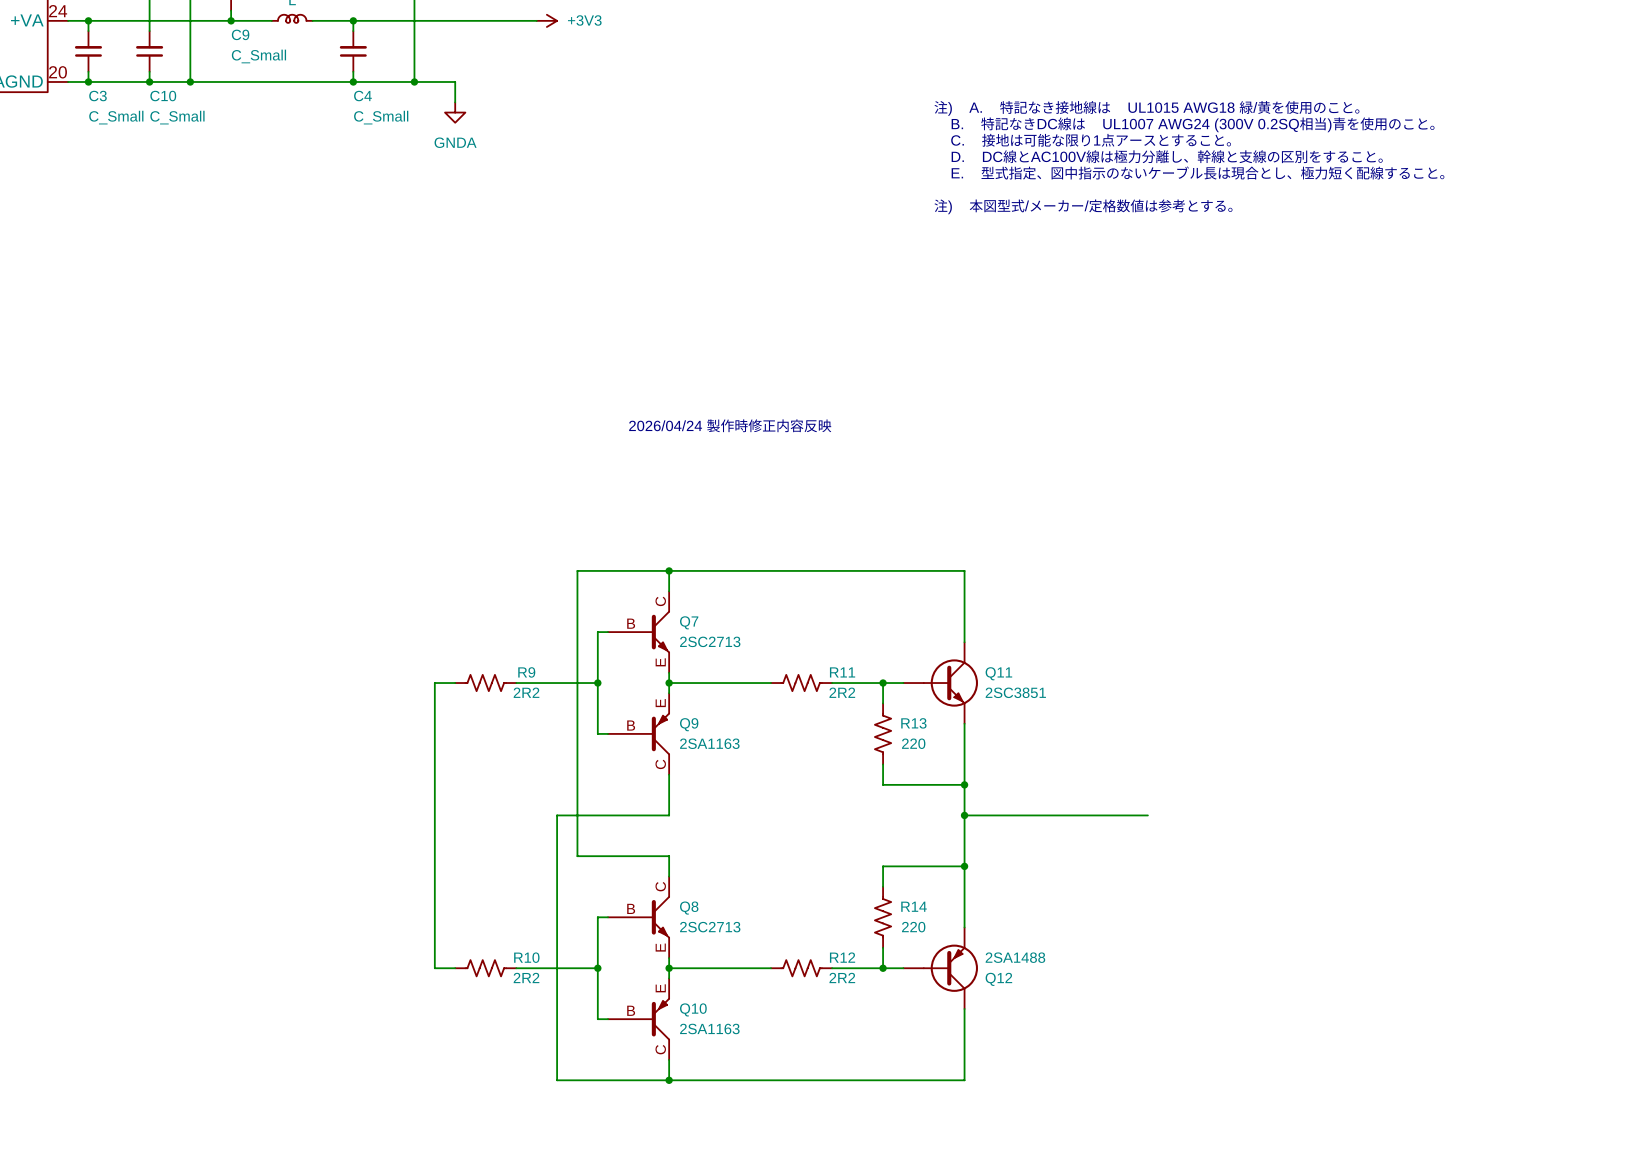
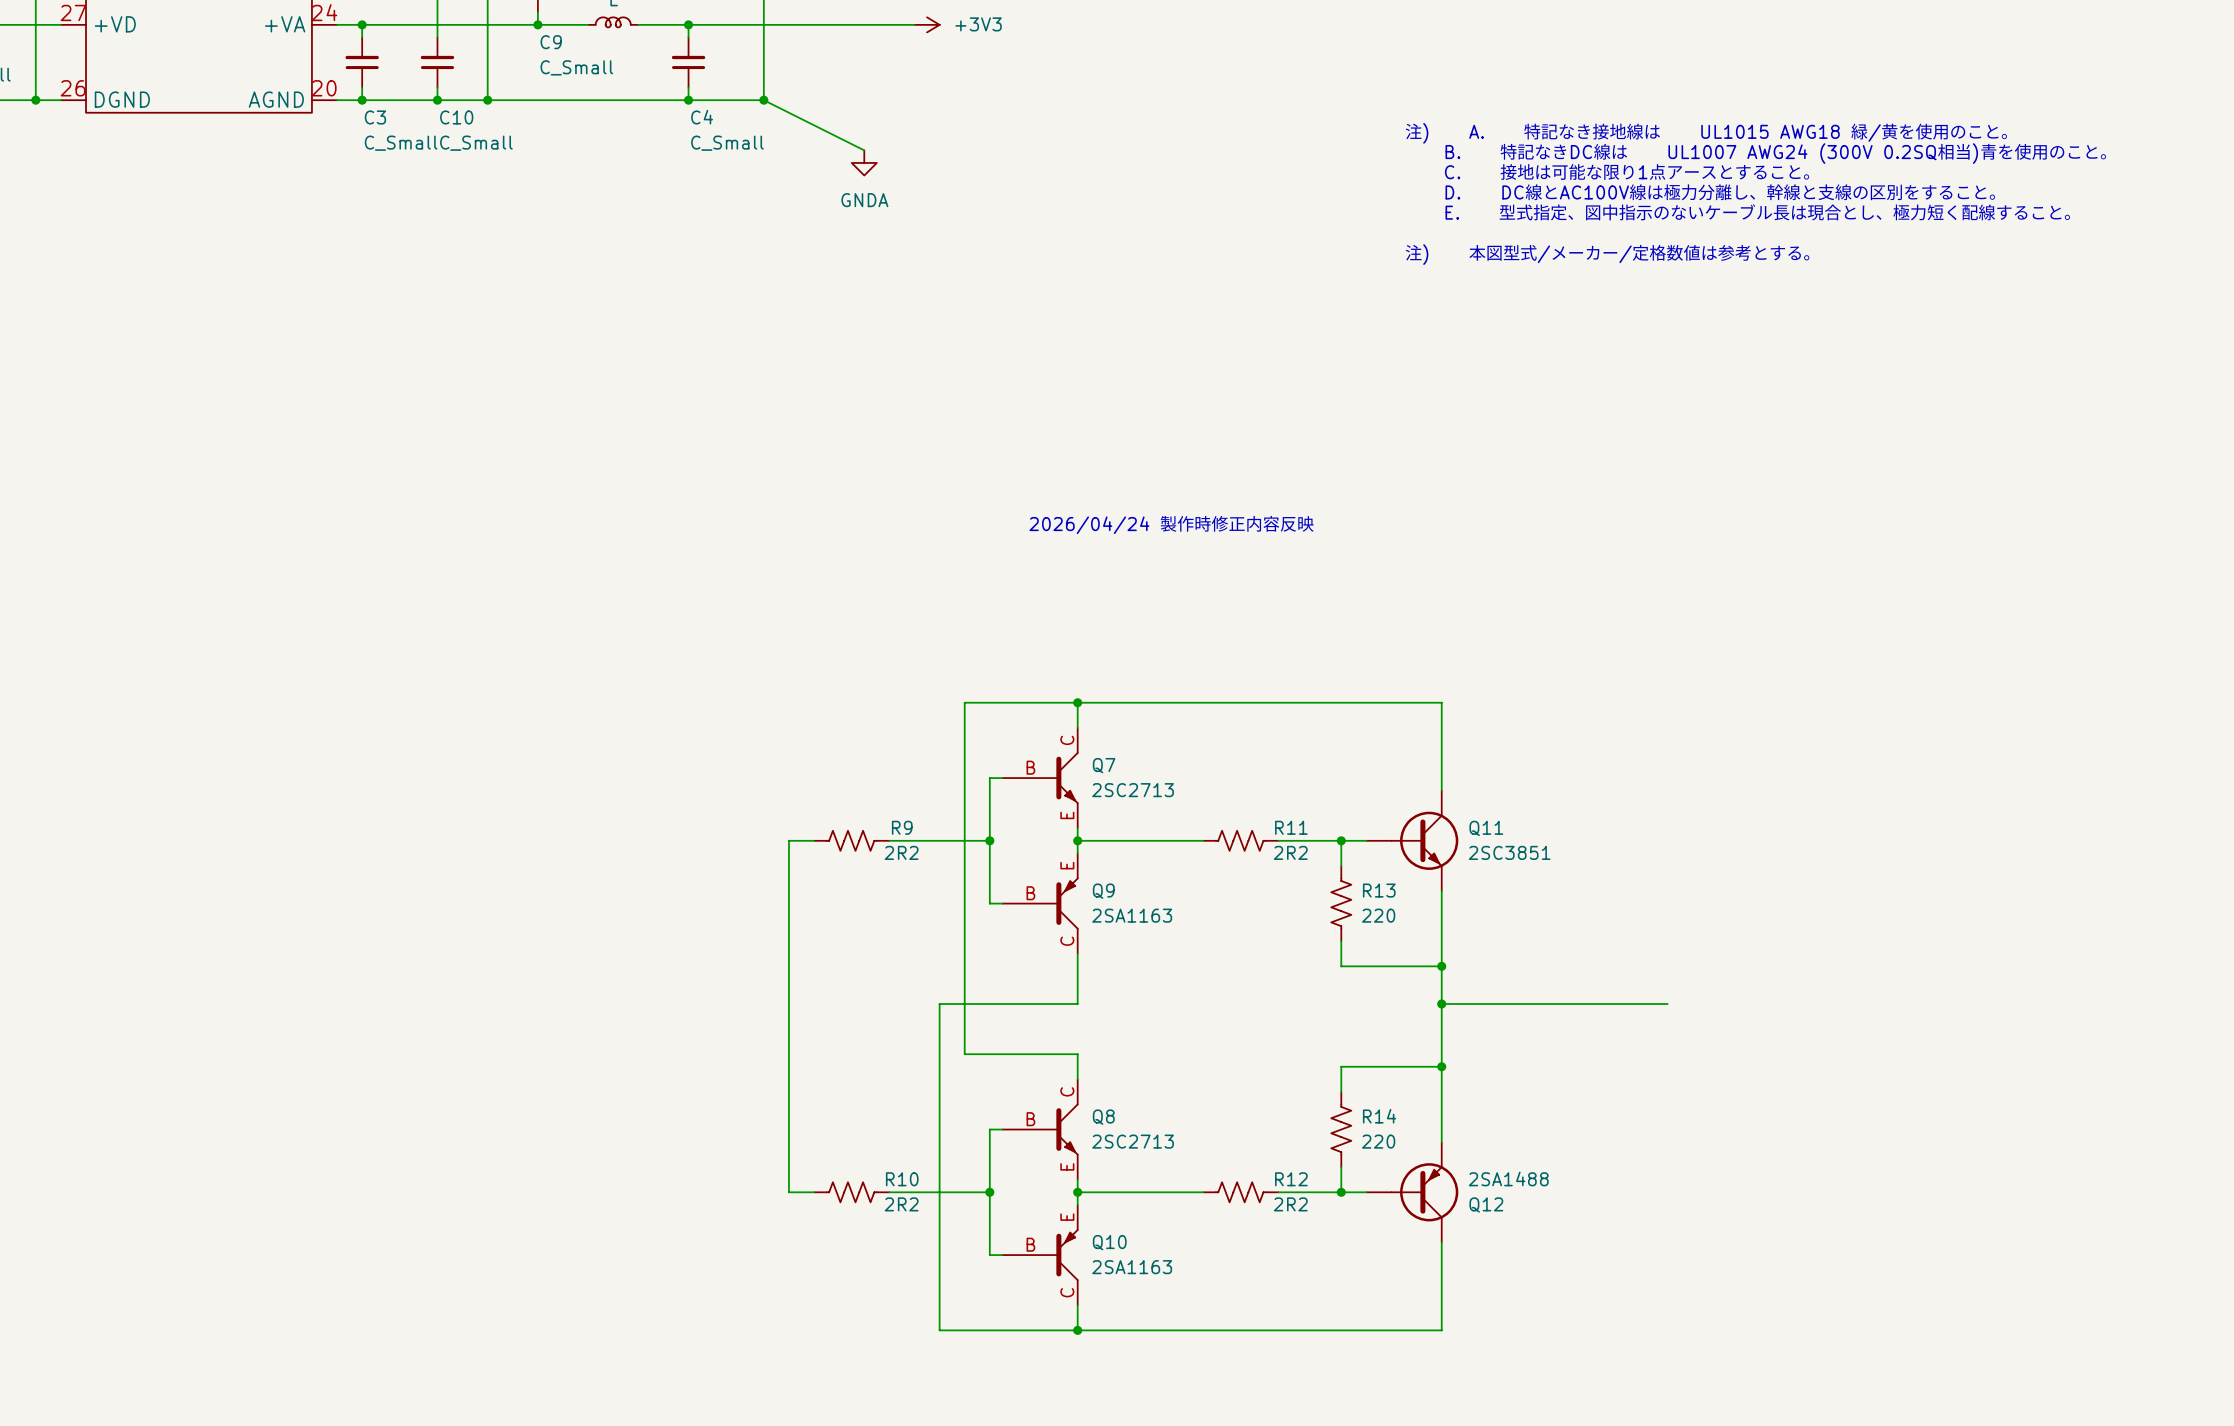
wire: (414, 81) (455, 81) (455, 102) -> (763, 100) (864, 150)
power symbol position: GNDA (455, 112) -> GNDA (864, 162)

